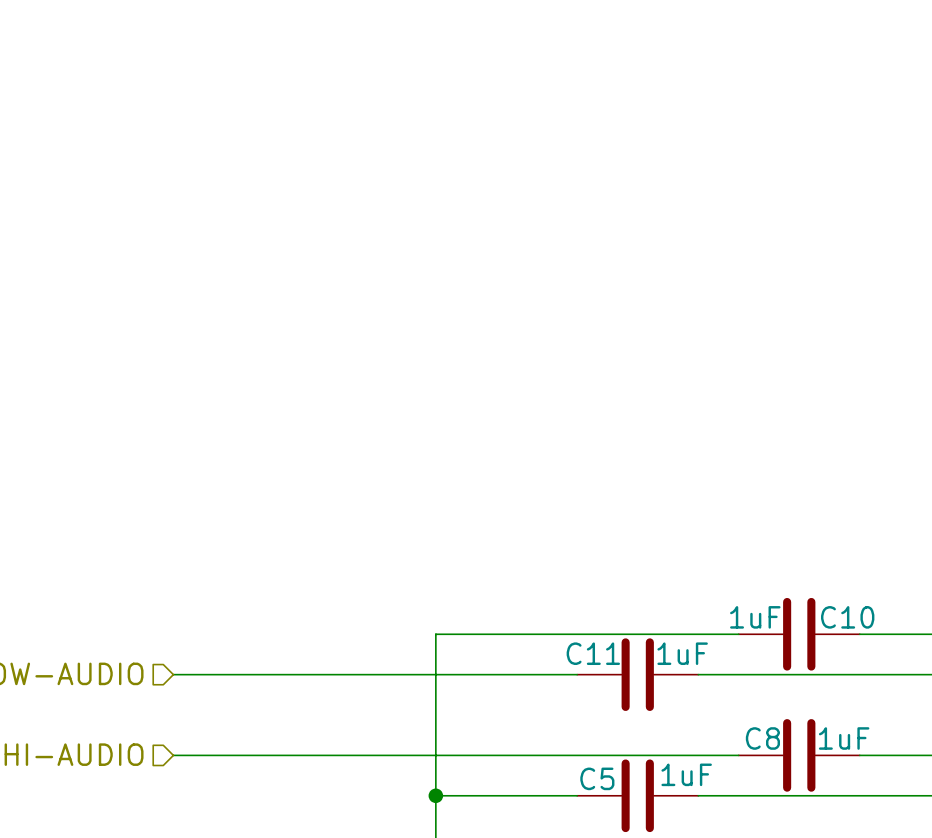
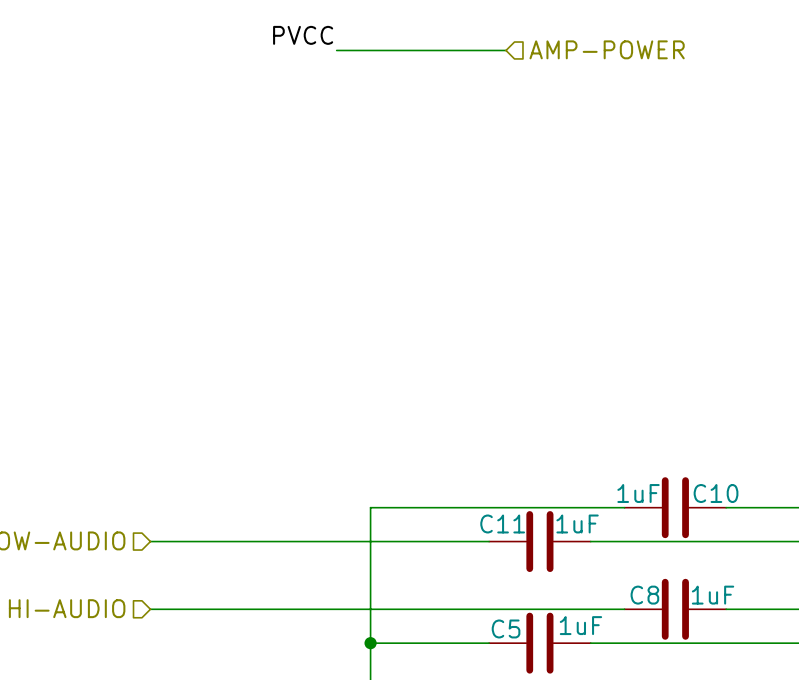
label: none -> PVCC (303, 35)
hierarchical label: none -> AMP-POWER (607, 49)
wire: none -> (336, 50) (506, 50)

